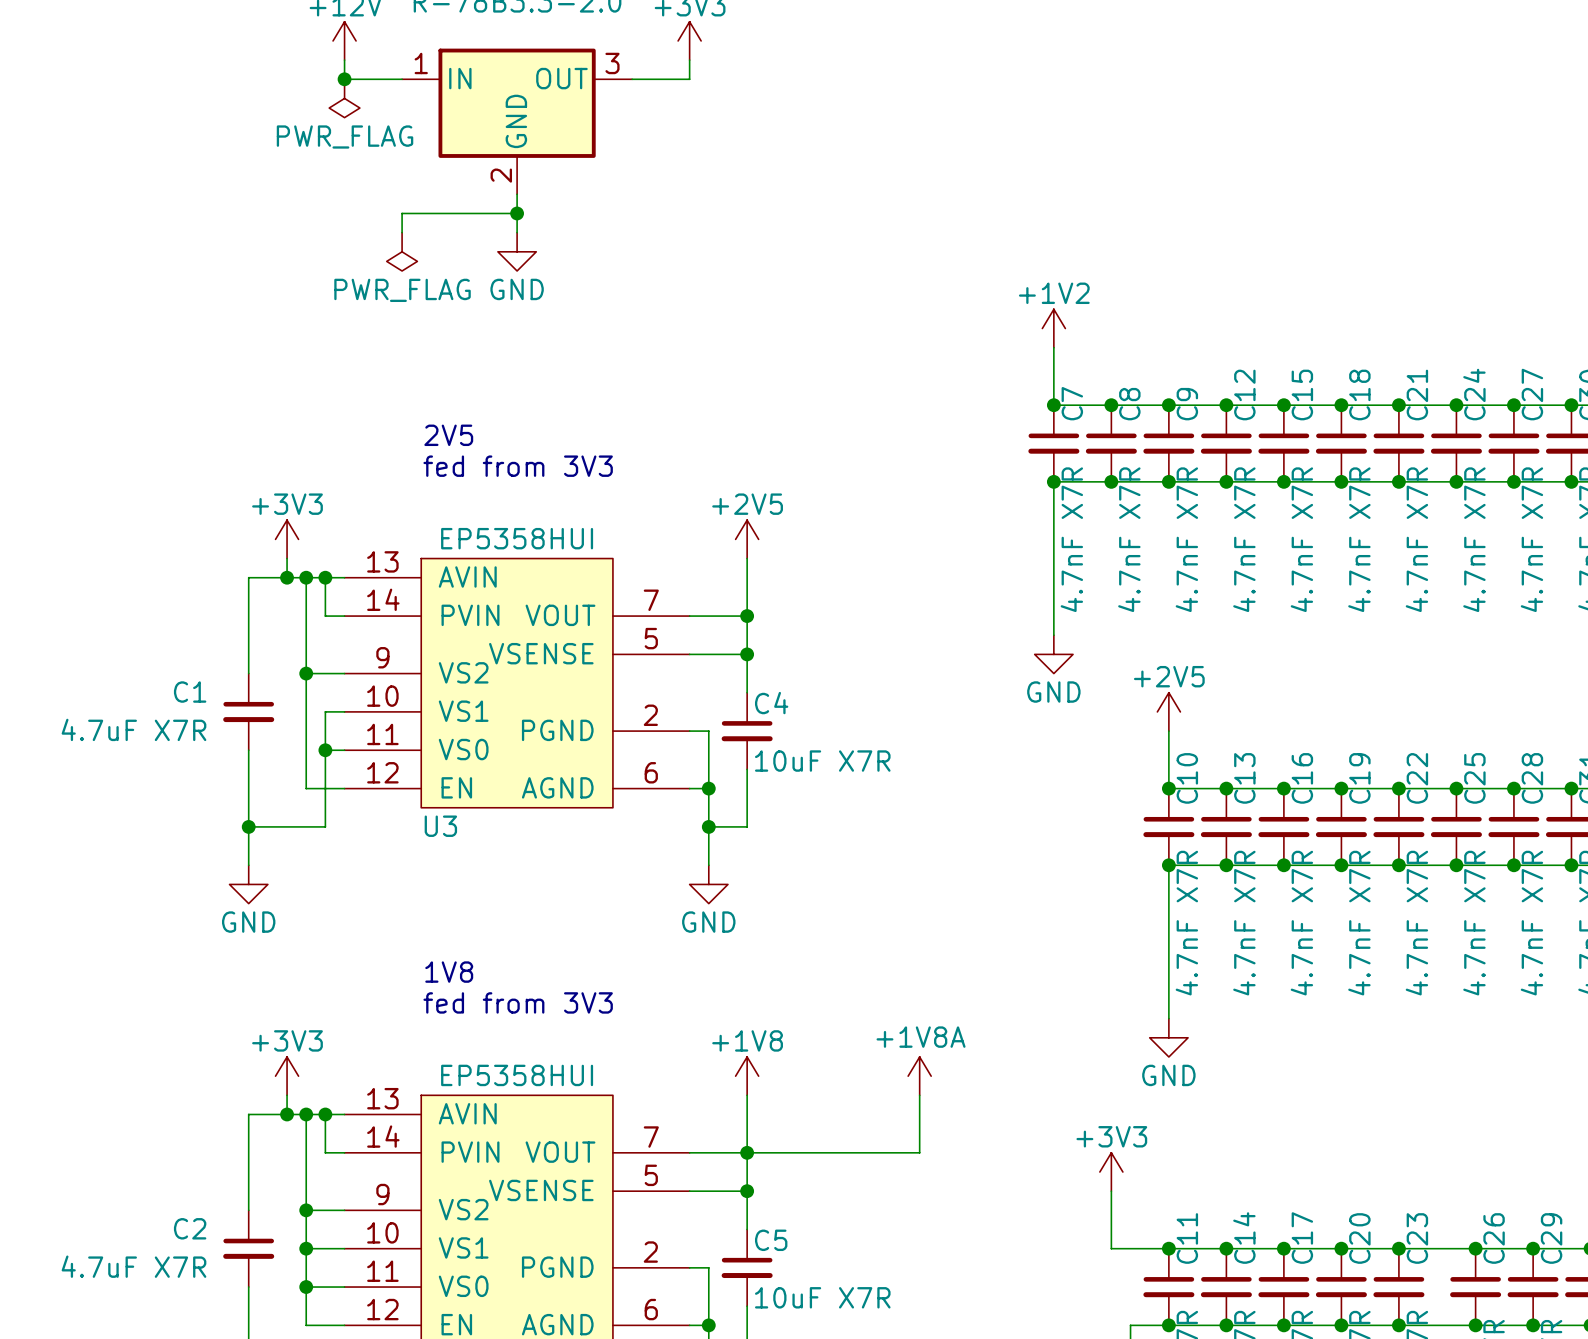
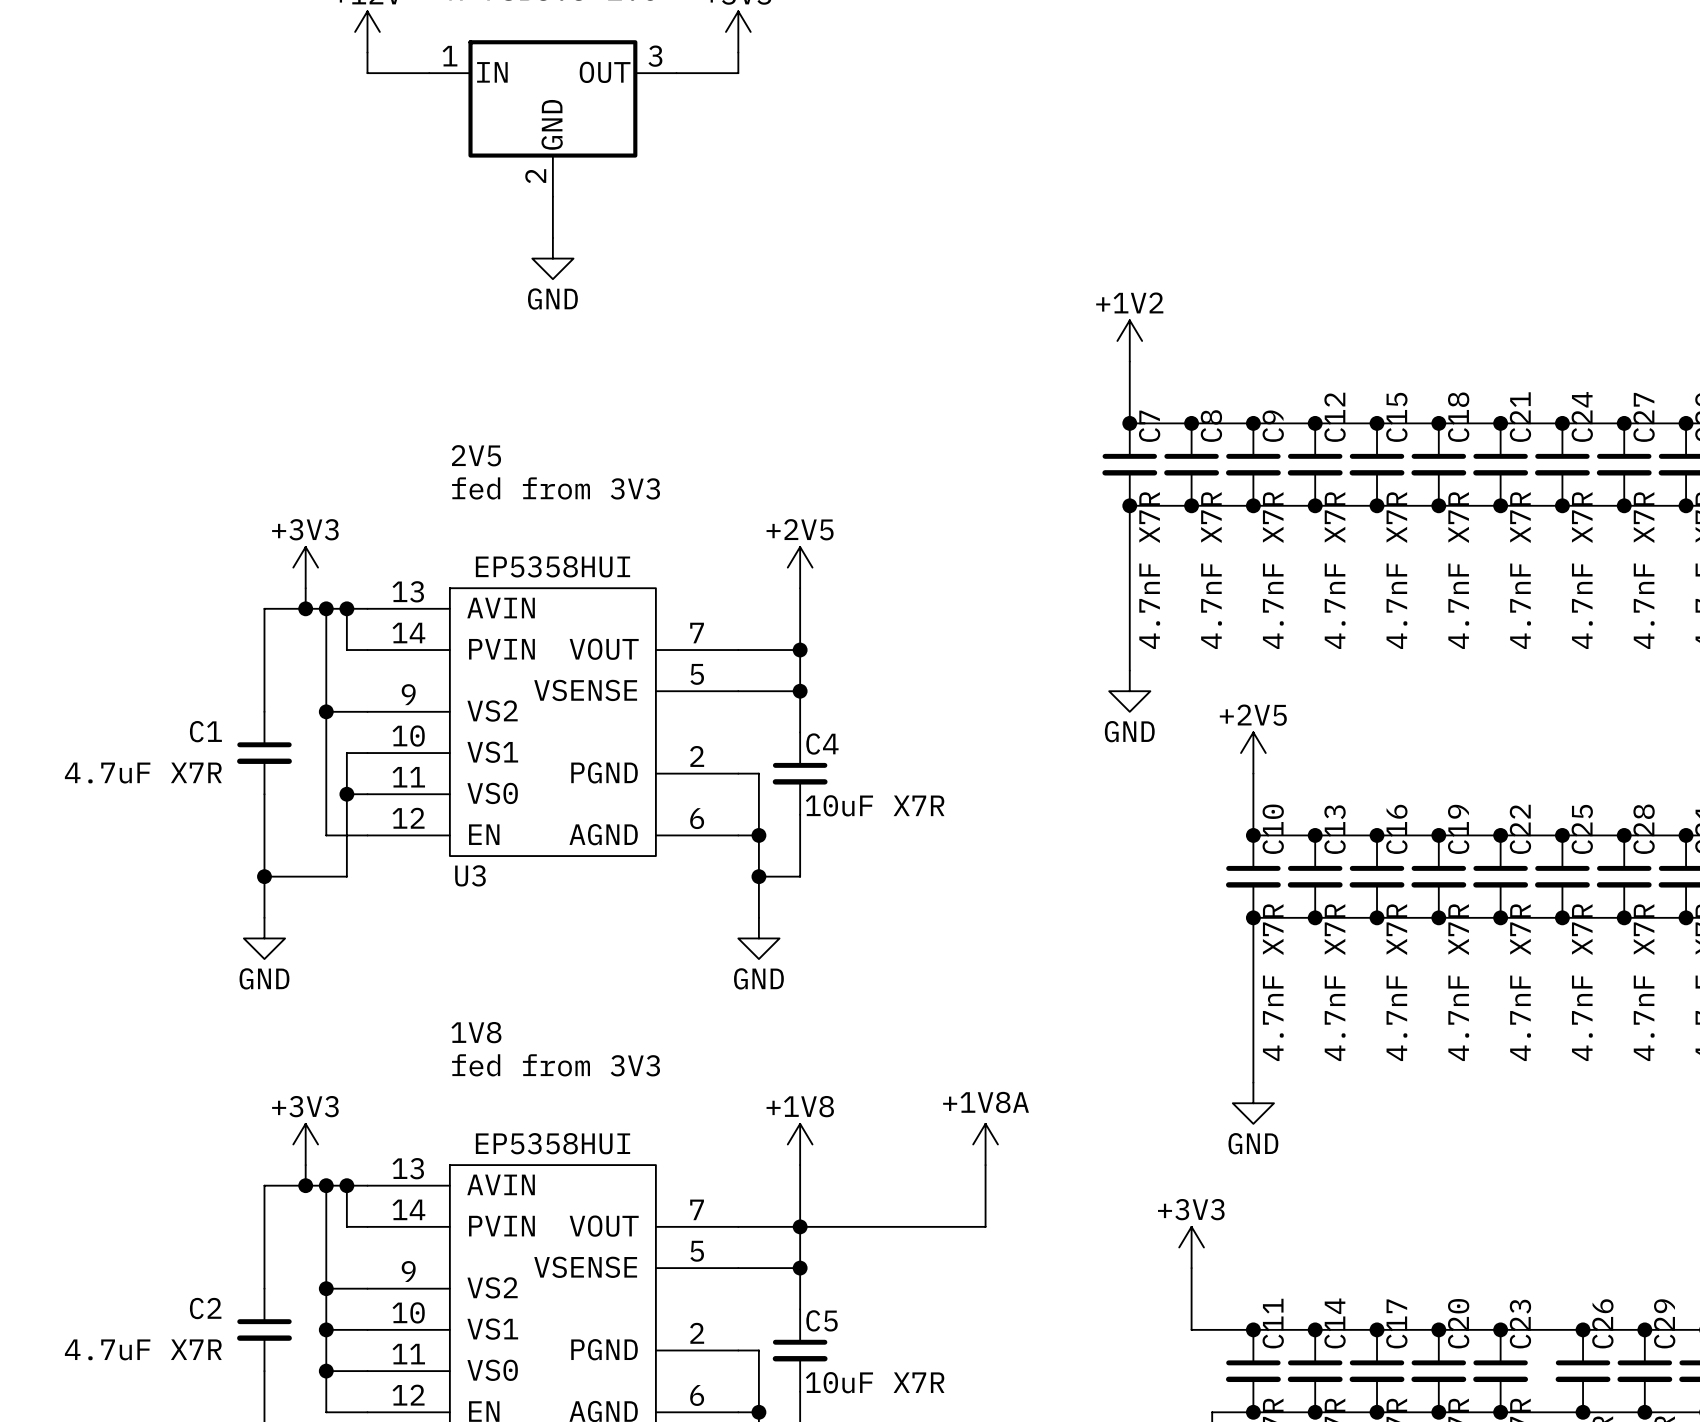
junction: (344, 79) -> none
power symbol: PWR_FLAG (344, 98) -> none
wire: (517, 213) (402, 213) (402, 232) -> none
junction: (517, 213) -> none
power symbol: PWR_FLAG (402, 251) -> none

